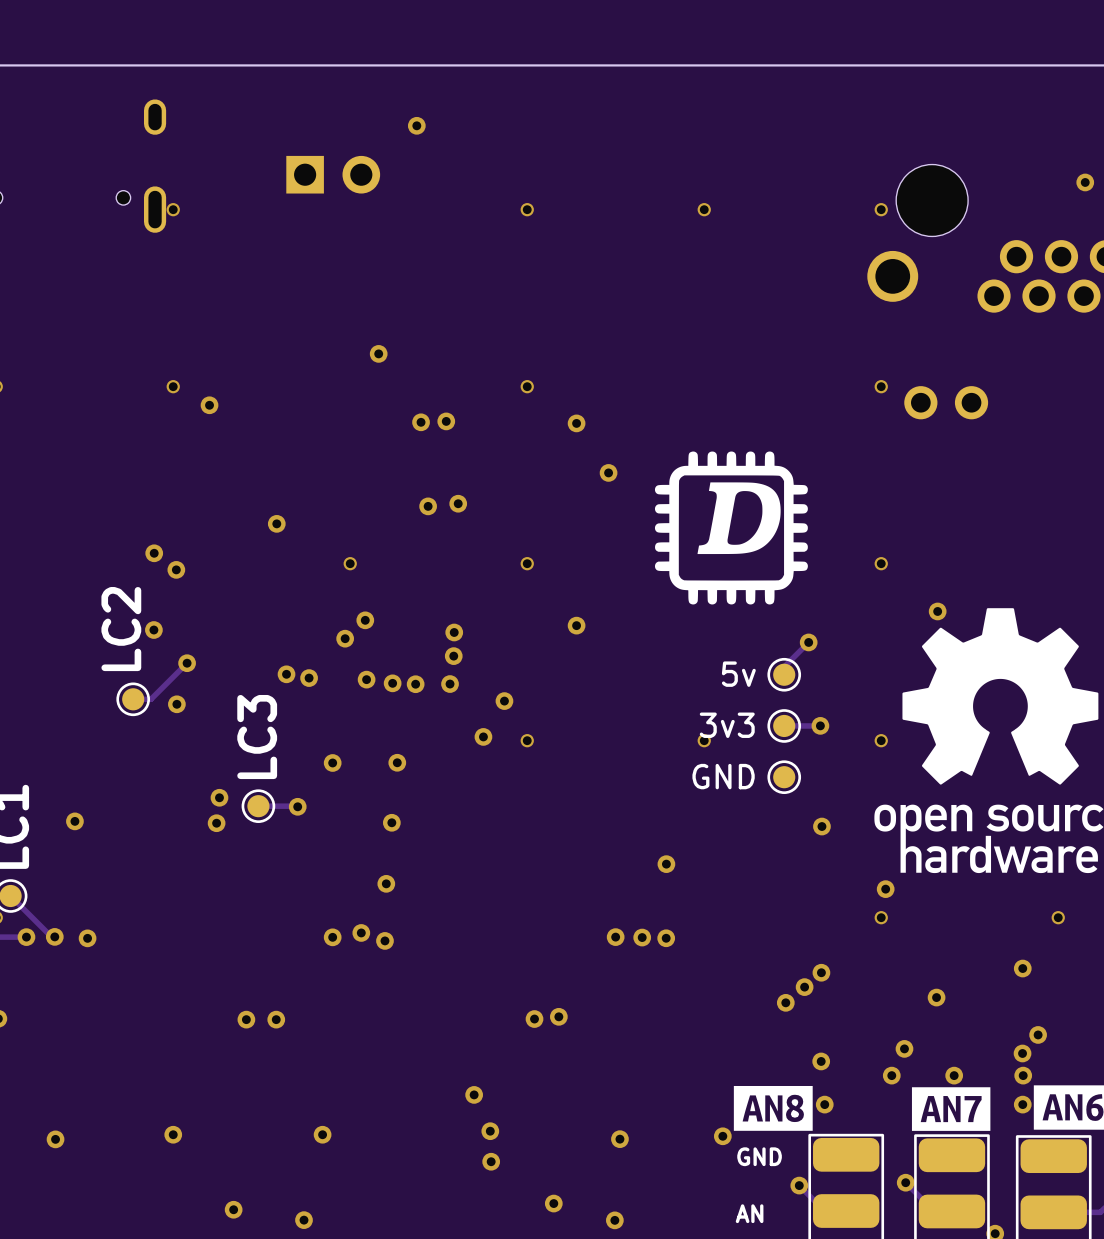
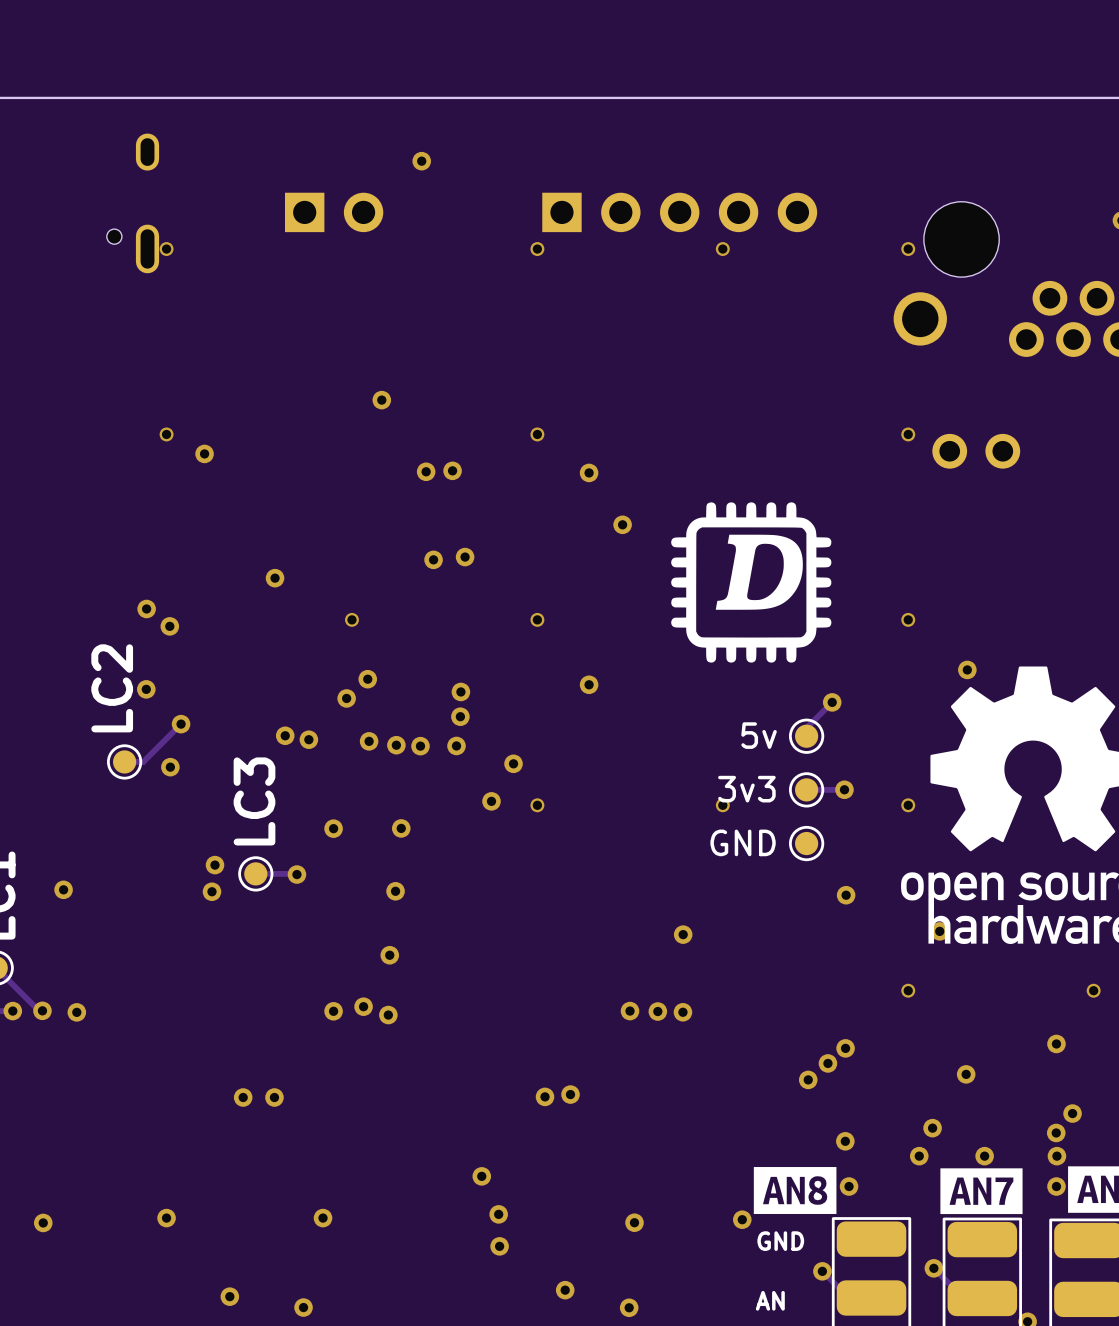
part: none -> (679, 212)
via position: (885, 889) -> (939, 931)

